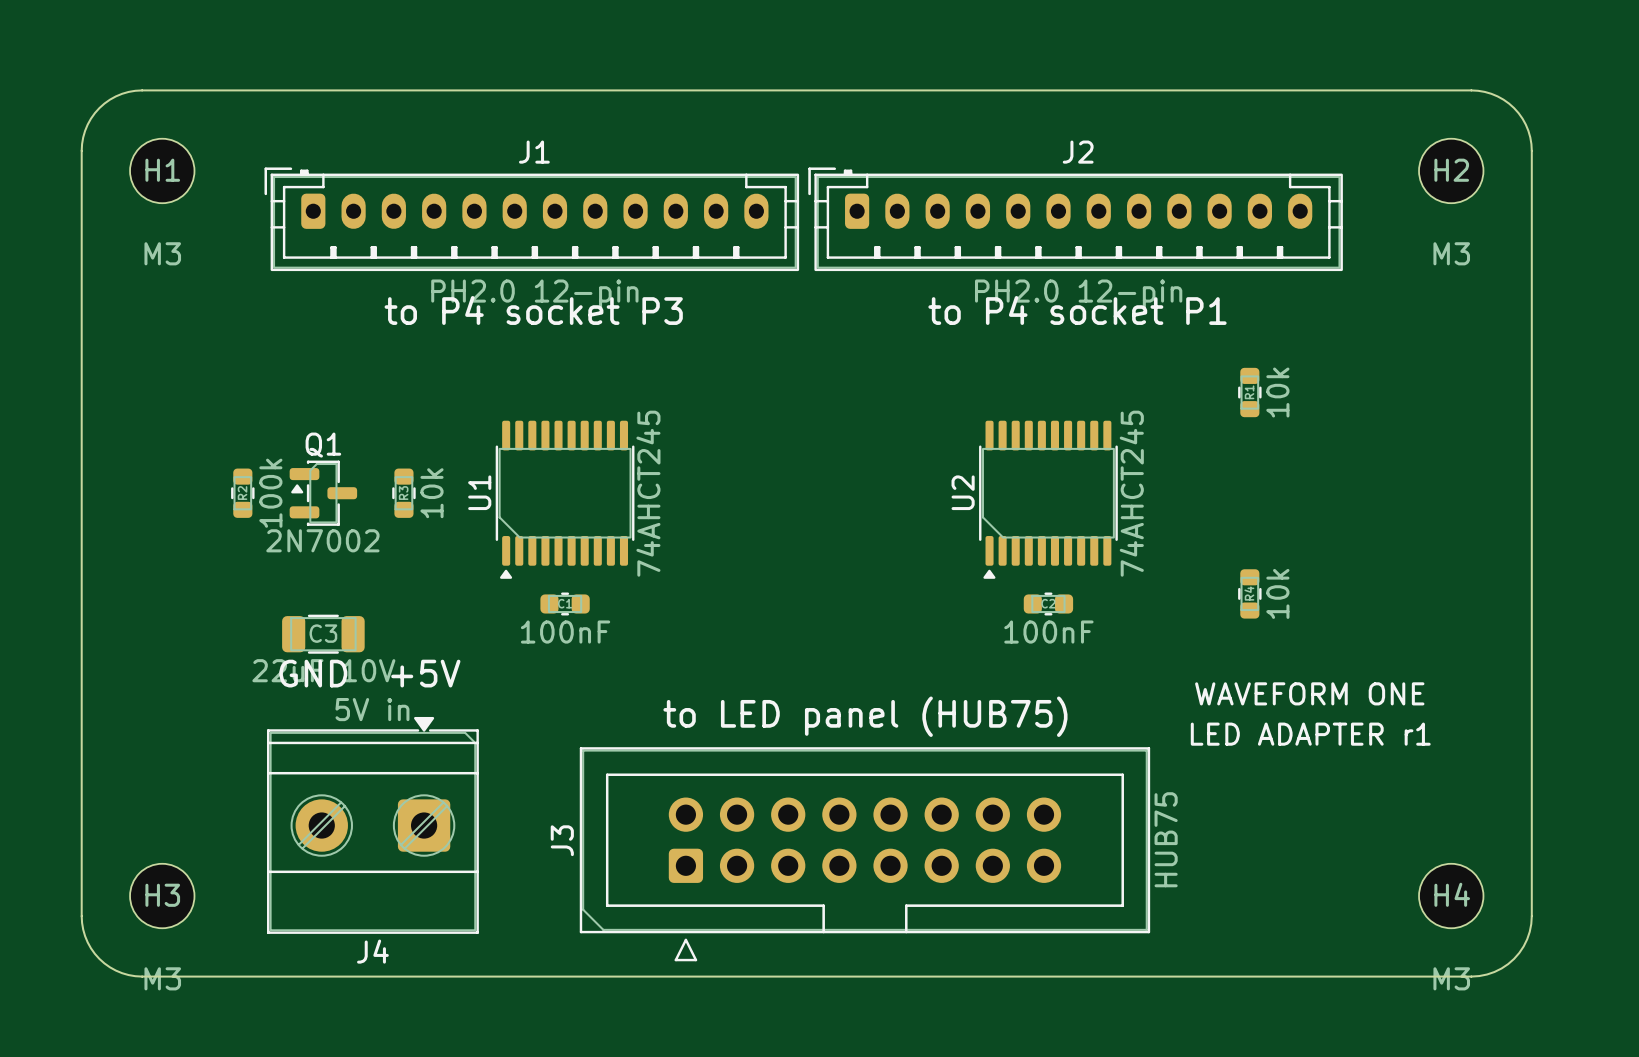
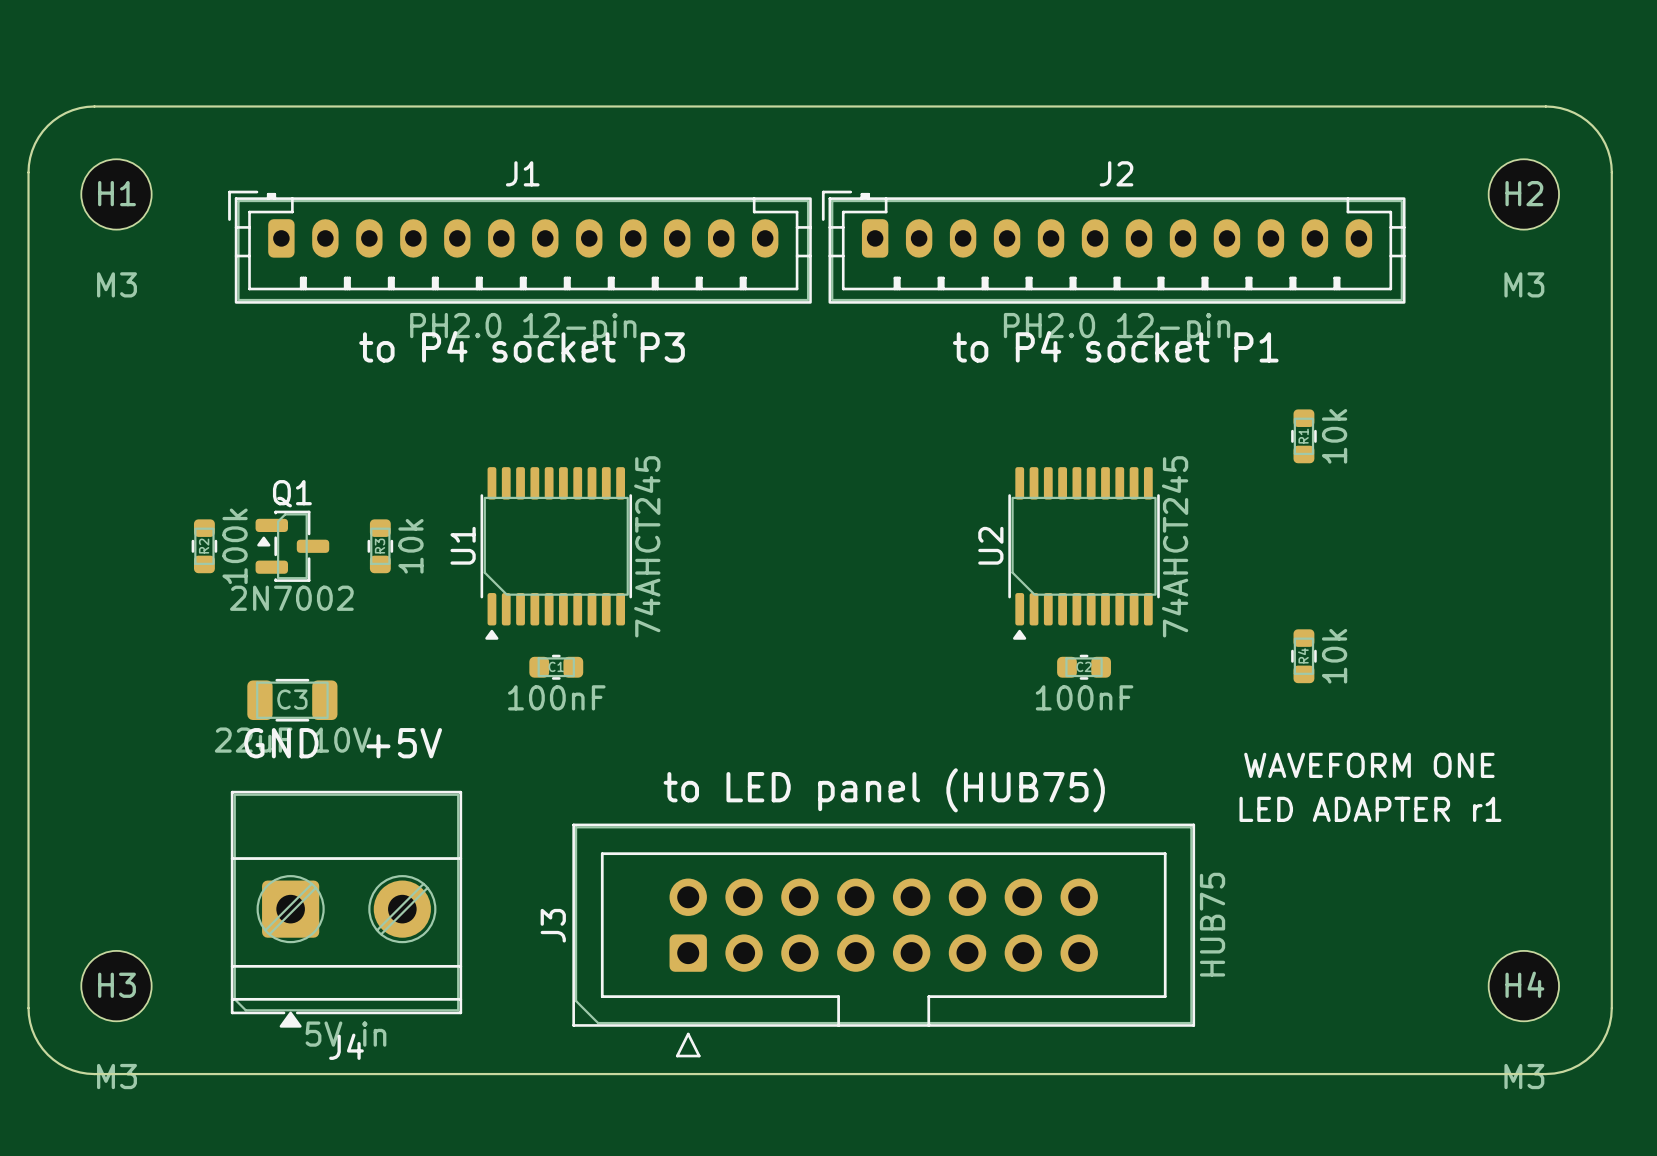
J4 rotation: 0° (372, 825) -> 180° (346, 909)

